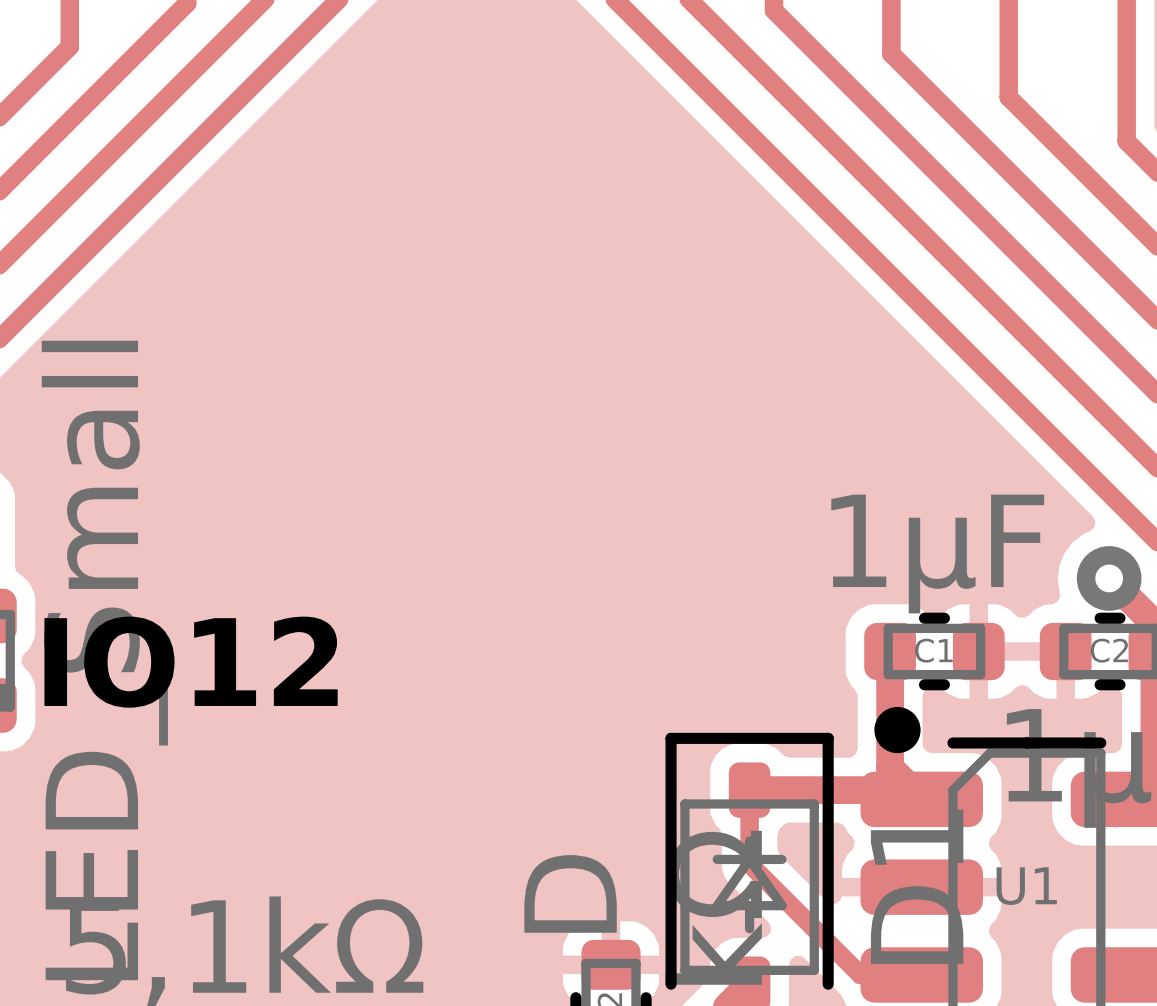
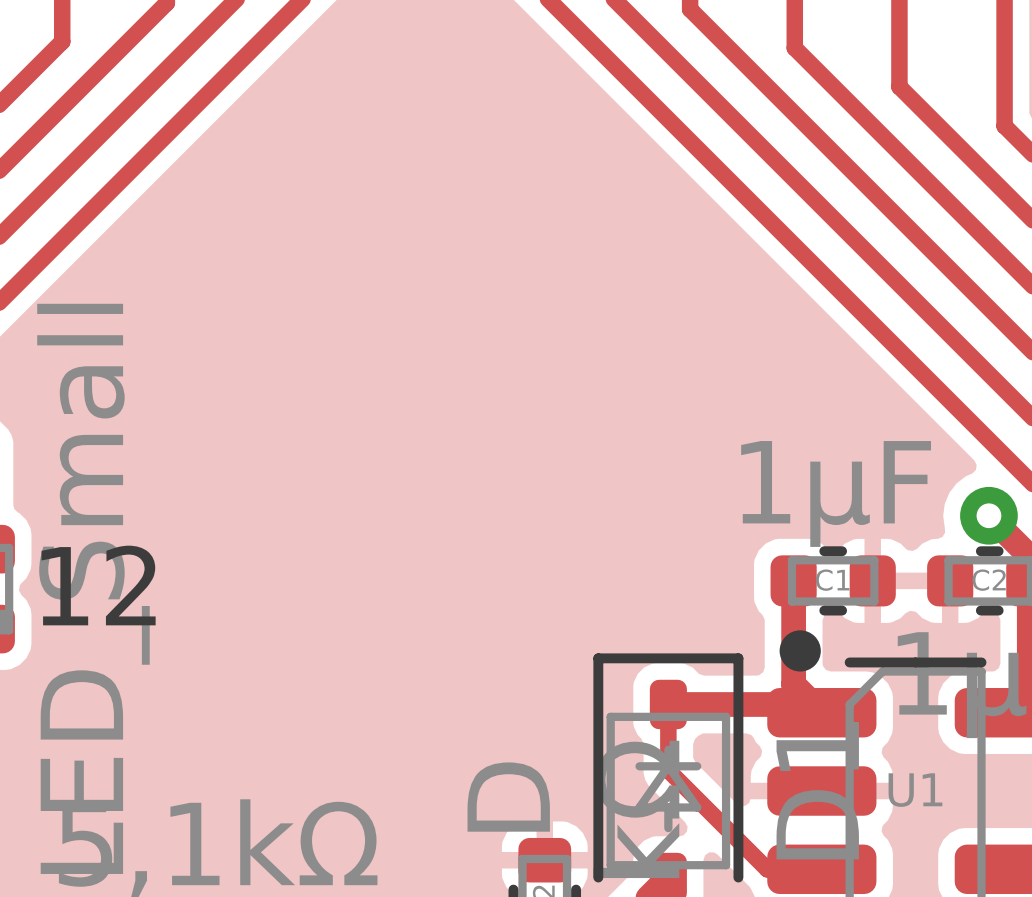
text: IO12 (191, 662) -> 12 (98, 585)

